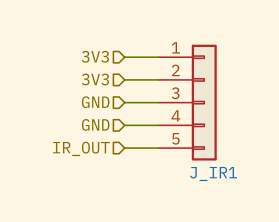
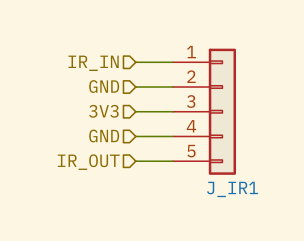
hierarchical label: 3V3 (95, 56) -> IR_IN (93, 63)
hierarchical label: 3V3 (95, 79) -> GND (104, 86)
hierarchical label: GND (95, 102) -> 3V3 (103, 111)

